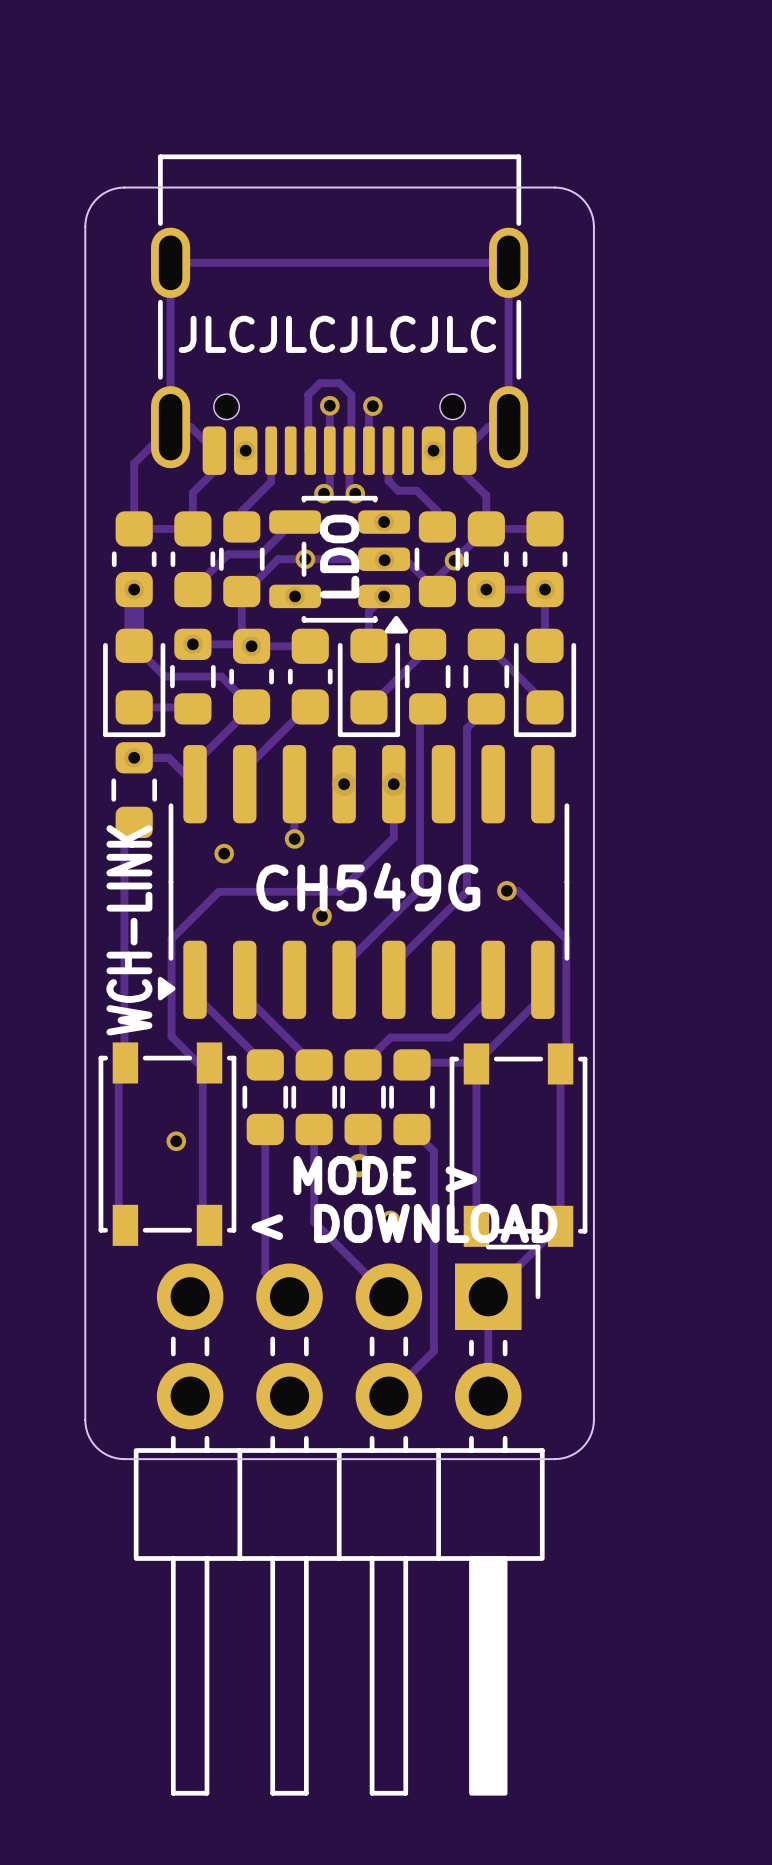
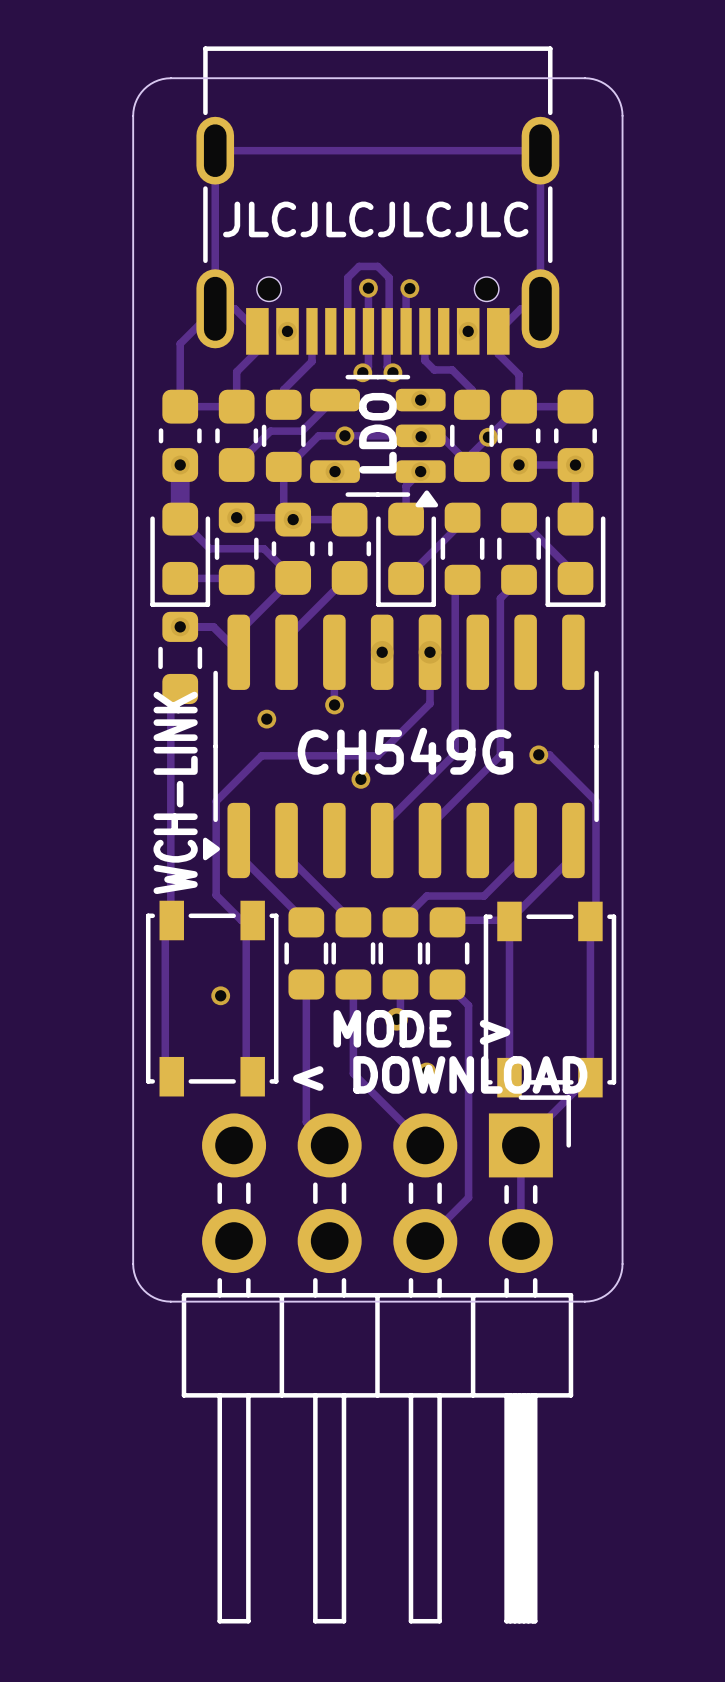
part footprint: [151, 154, 529, 475] -> [196, 46, 560, 355]
part footprint: [269, 495, 411, 634] -> [310, 374, 446, 508]
part footprint: [133, 1244, 545, 1796] -> [181, 1095, 574, 1624]

